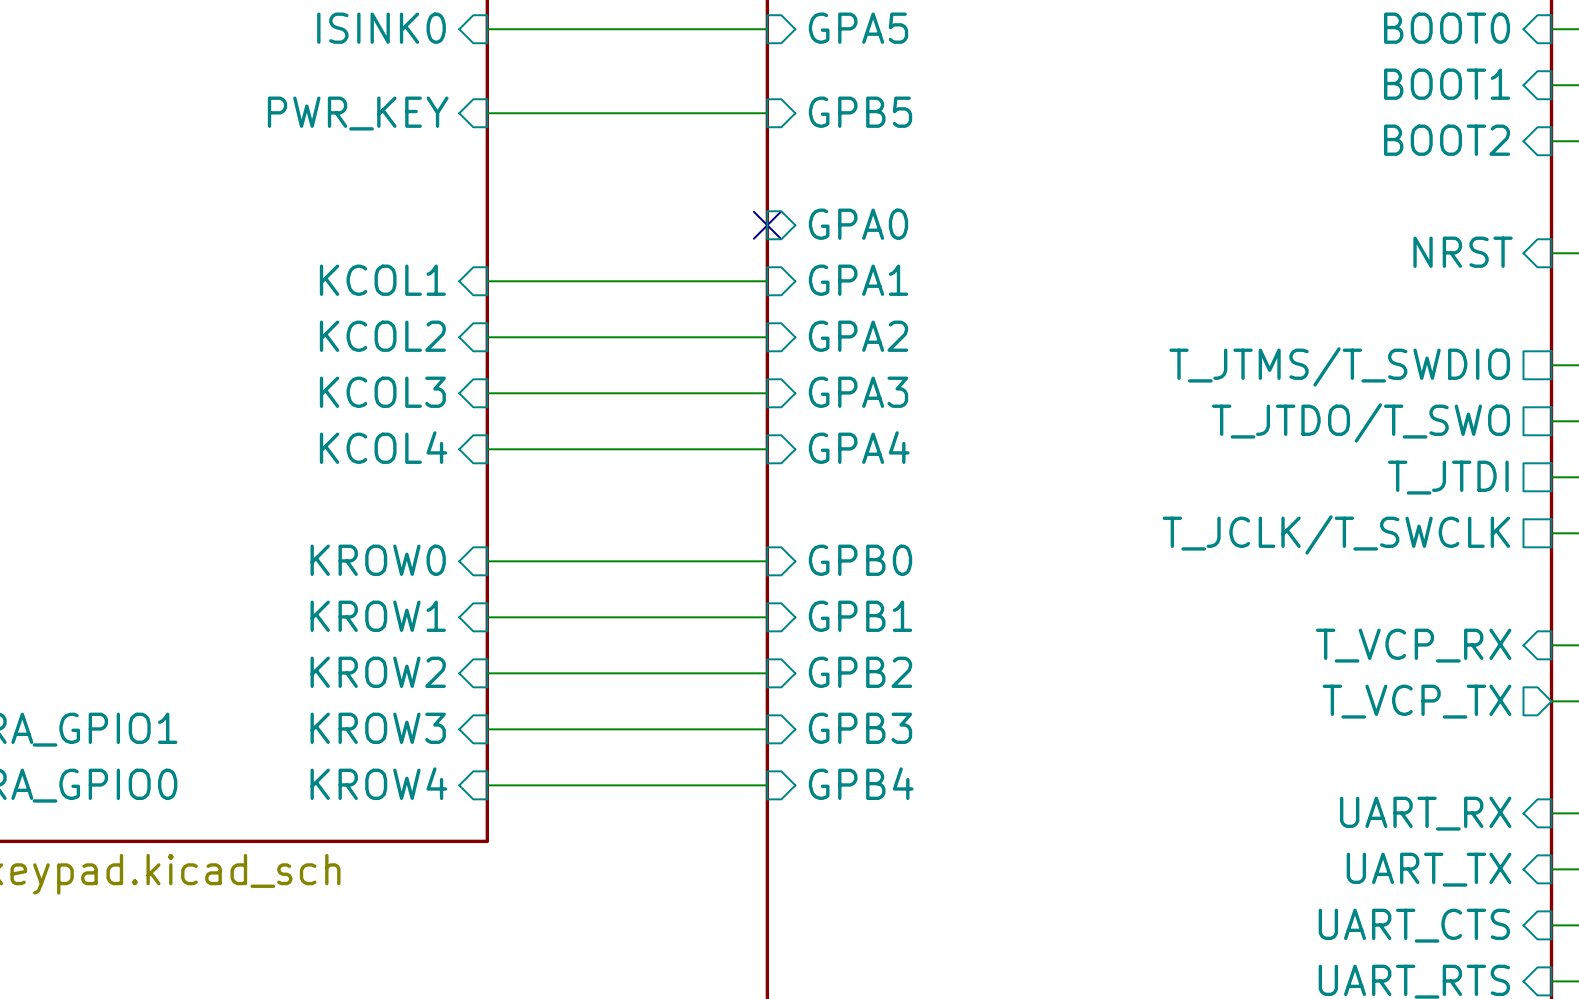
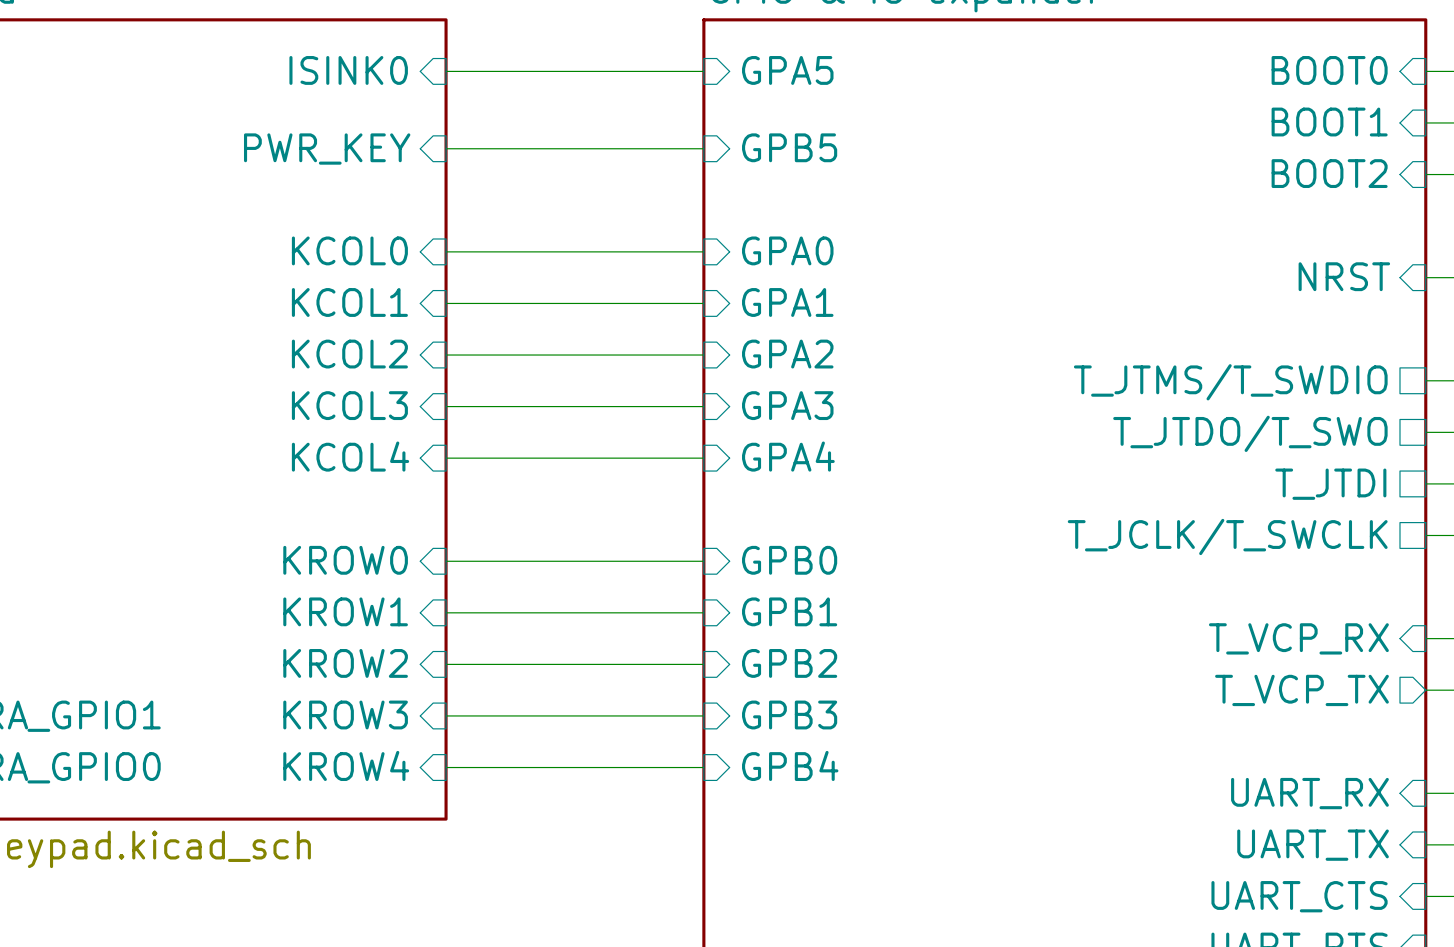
sheet pin: none -> KCOL0 (349, 250)
wire: none -> (446, 251) (703, 251)
no-connect mark: (767, 225) -> none

